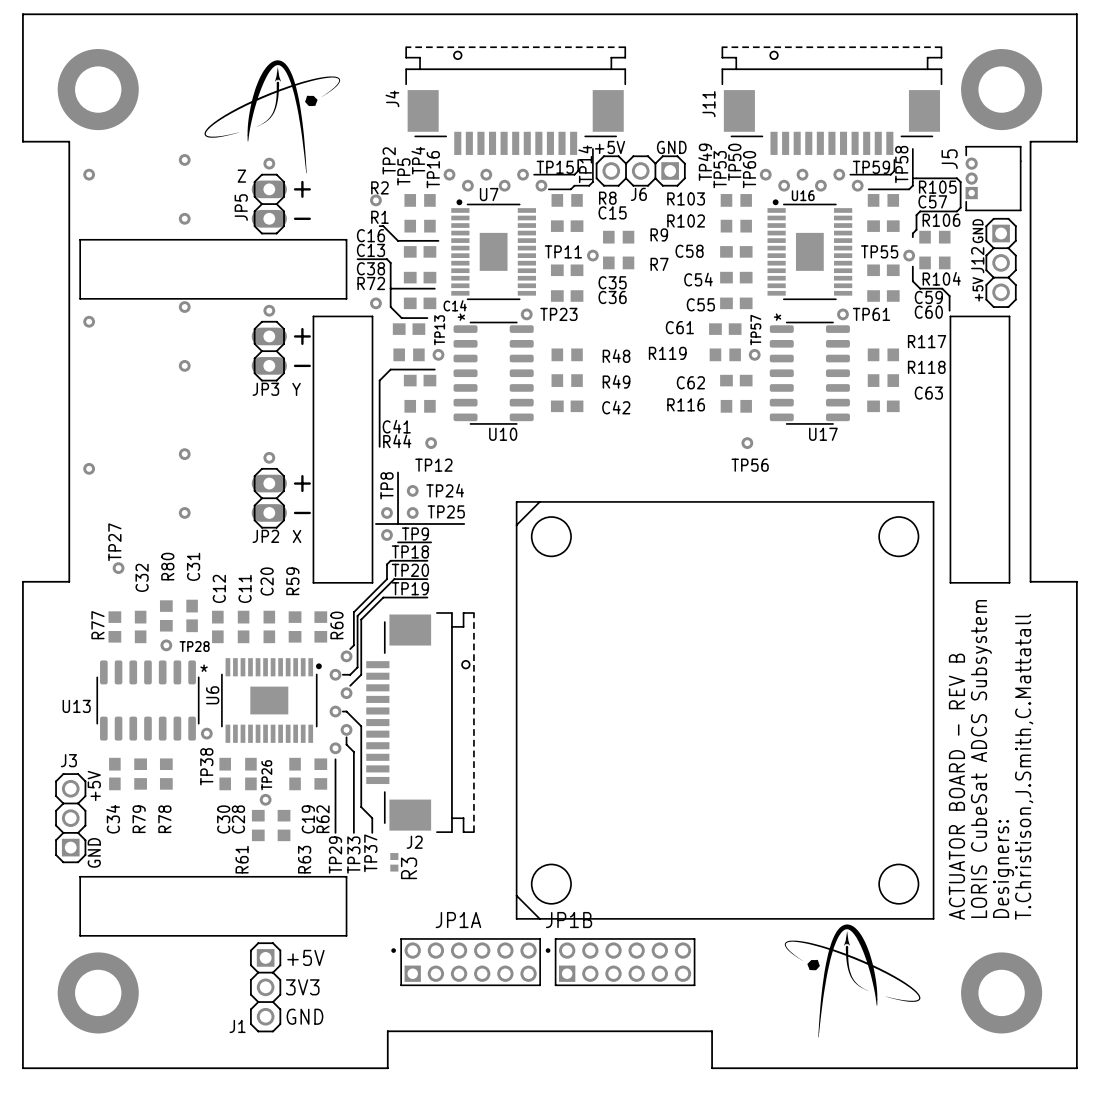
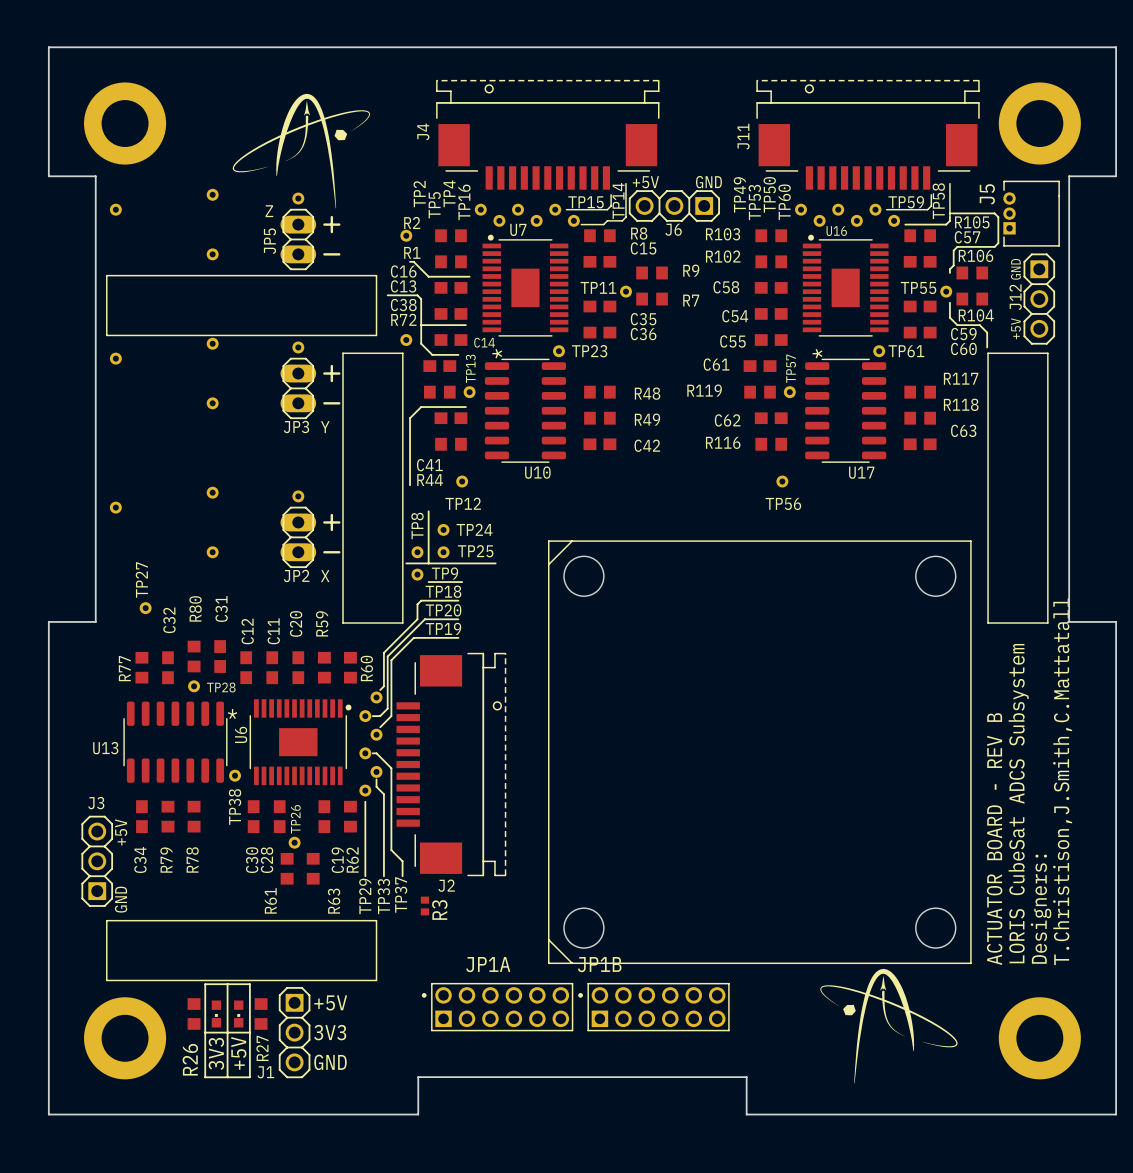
line: none -> (205, 984) (205, 1077) (249, 1077) (249, 984) (205, 984)
line: none -> (227, 984) (227, 1077)
R26: none -> (194, 1013)
part: none -> (216, 1013)
part: none -> (238, 1013)
R27: none -> (261, 1013)
line: none -> (205, 1032) (249, 1032)
text: none -> 3V3 (216, 1053)
text: none -> +5V (238, 1053)

